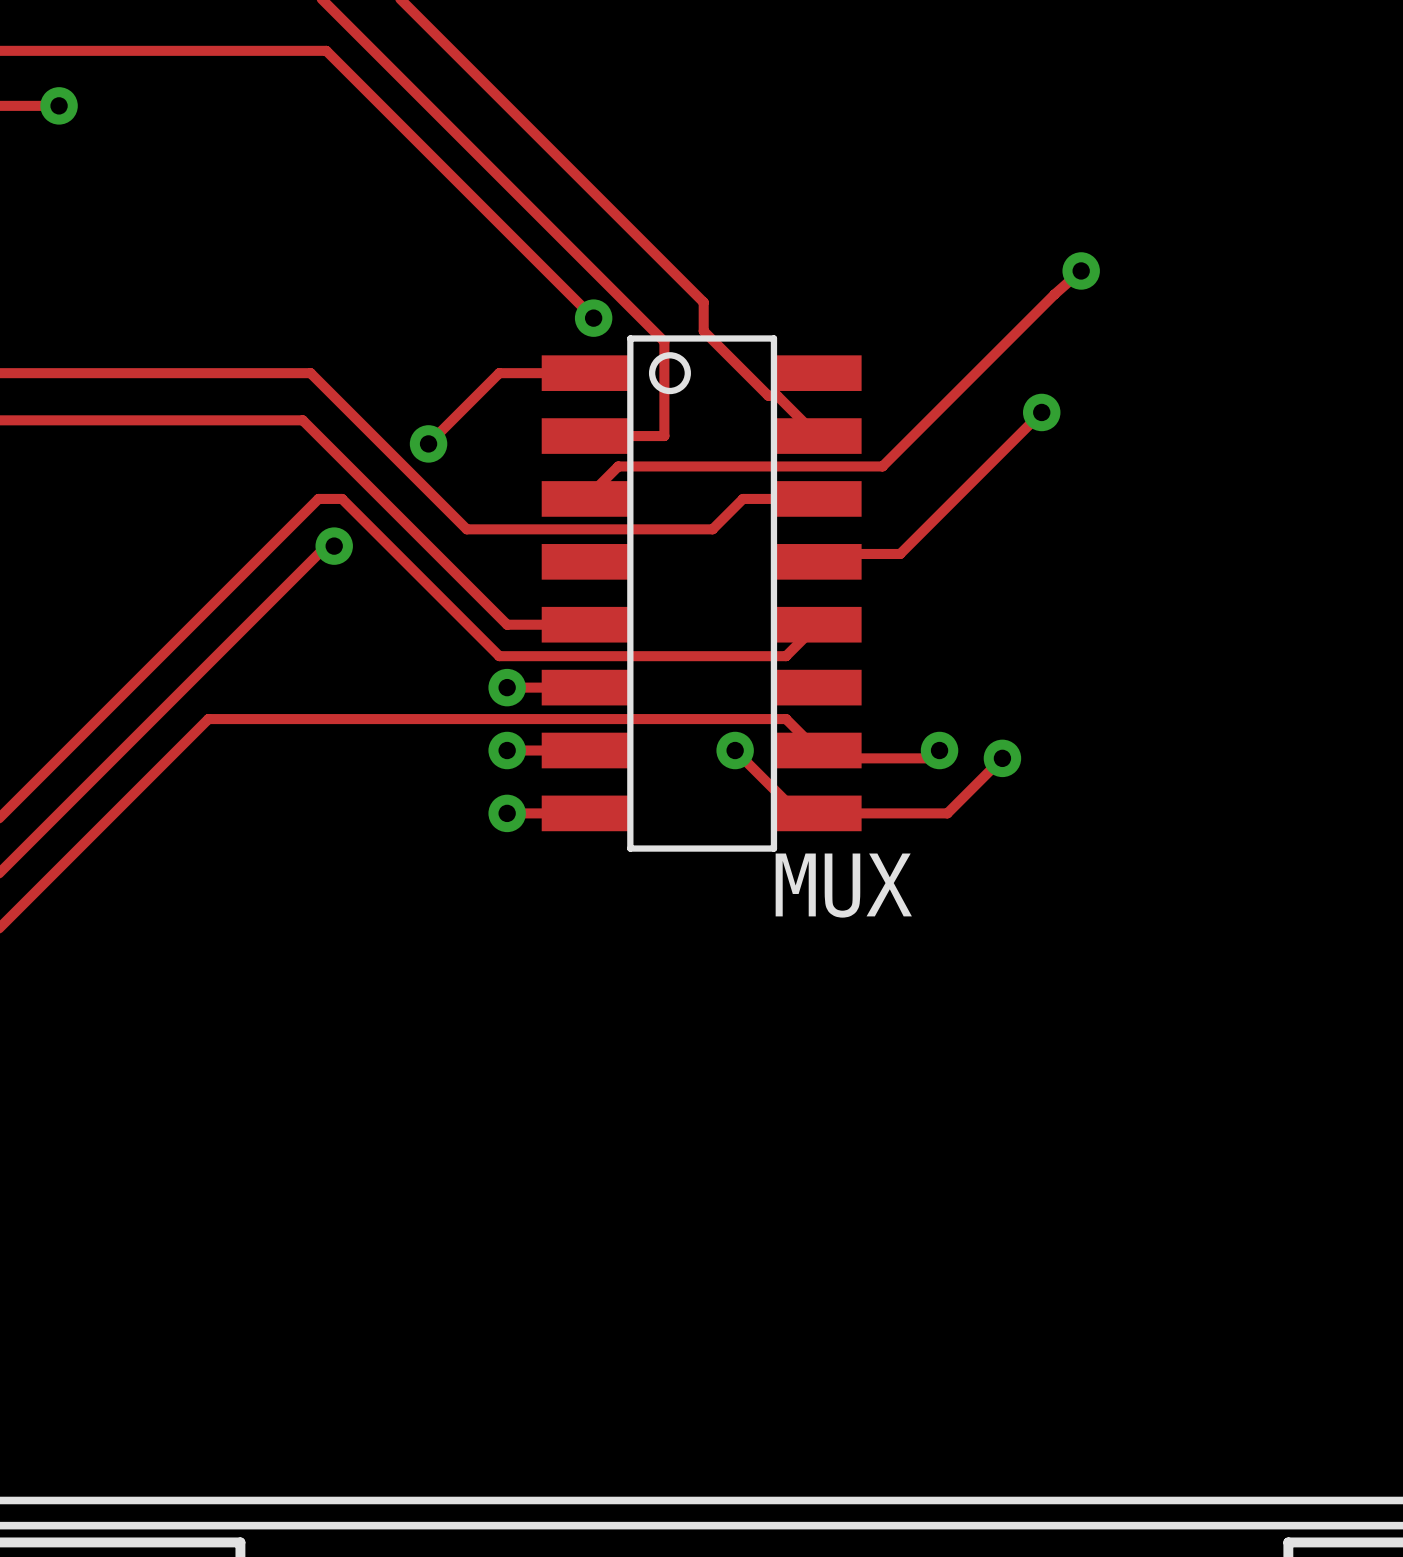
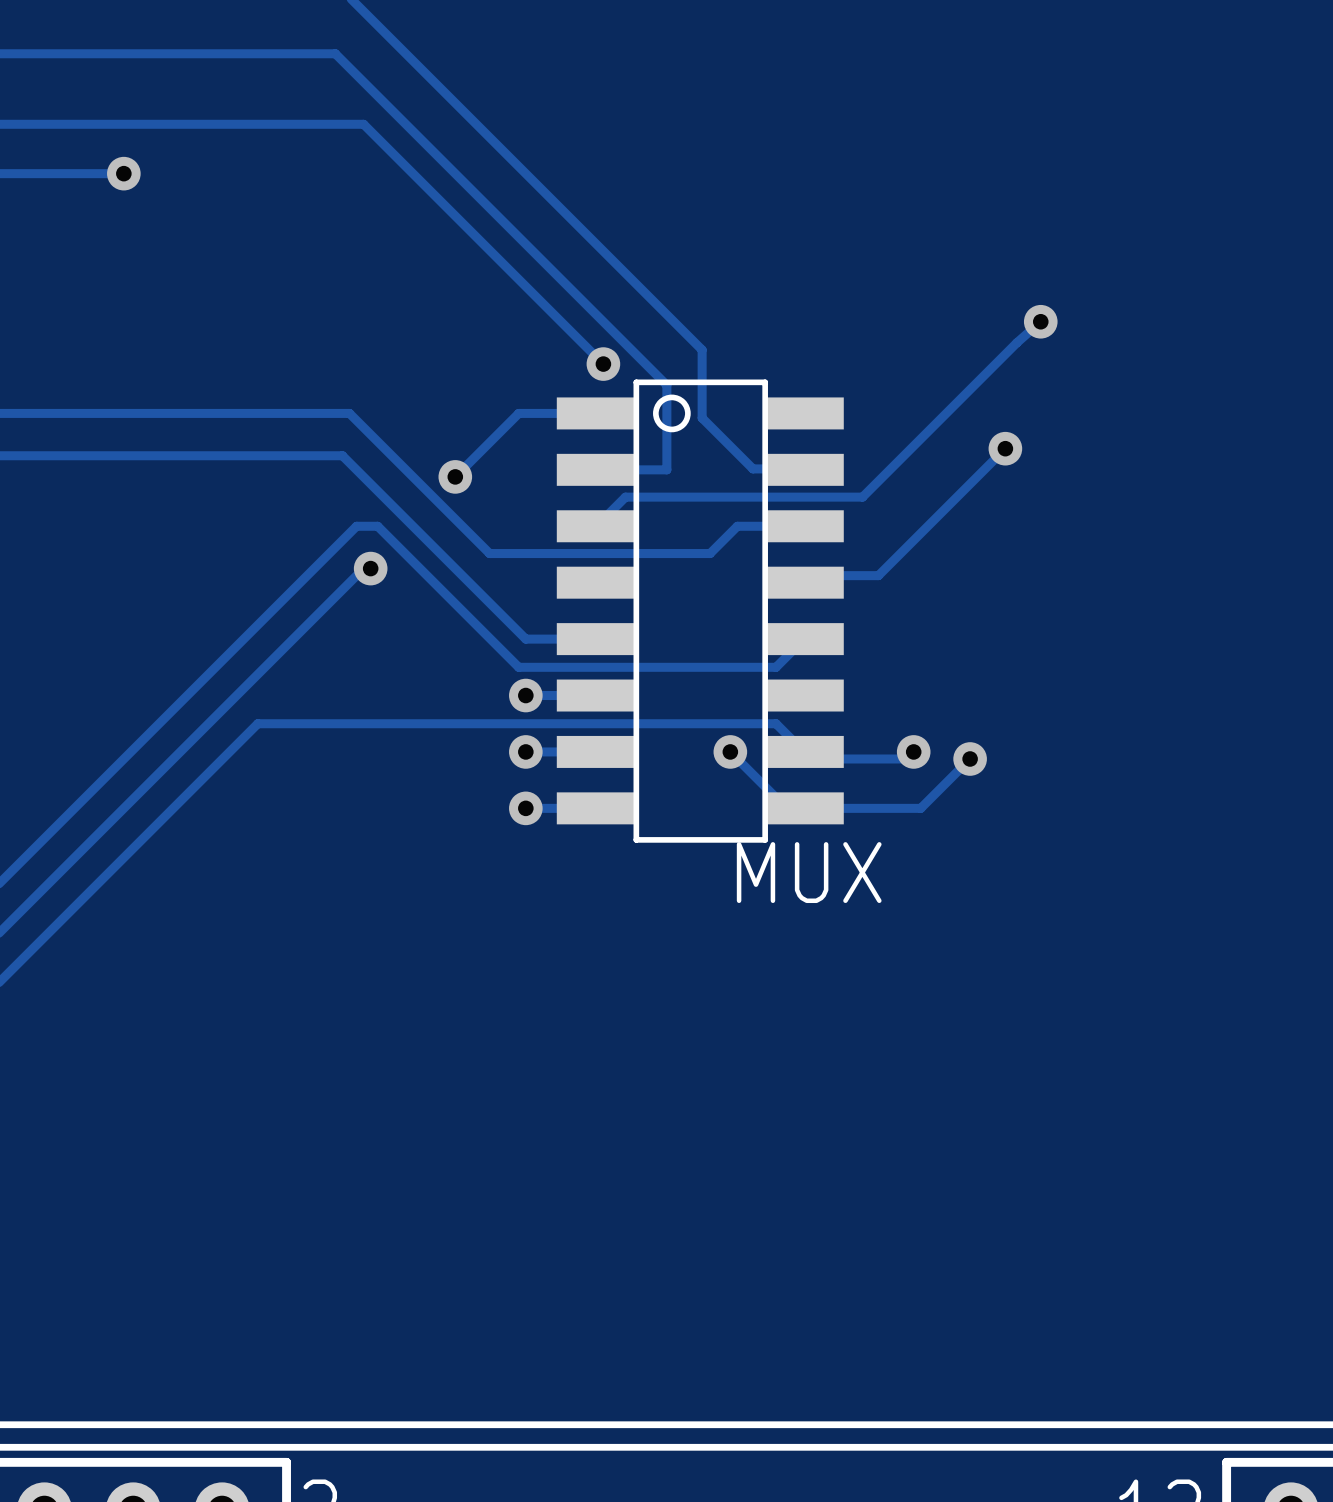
track: (703, 331) (768, 395) (777, 395) (816, 435) -> (702, 375) (702, 418) (752, 468) (803, 468)

